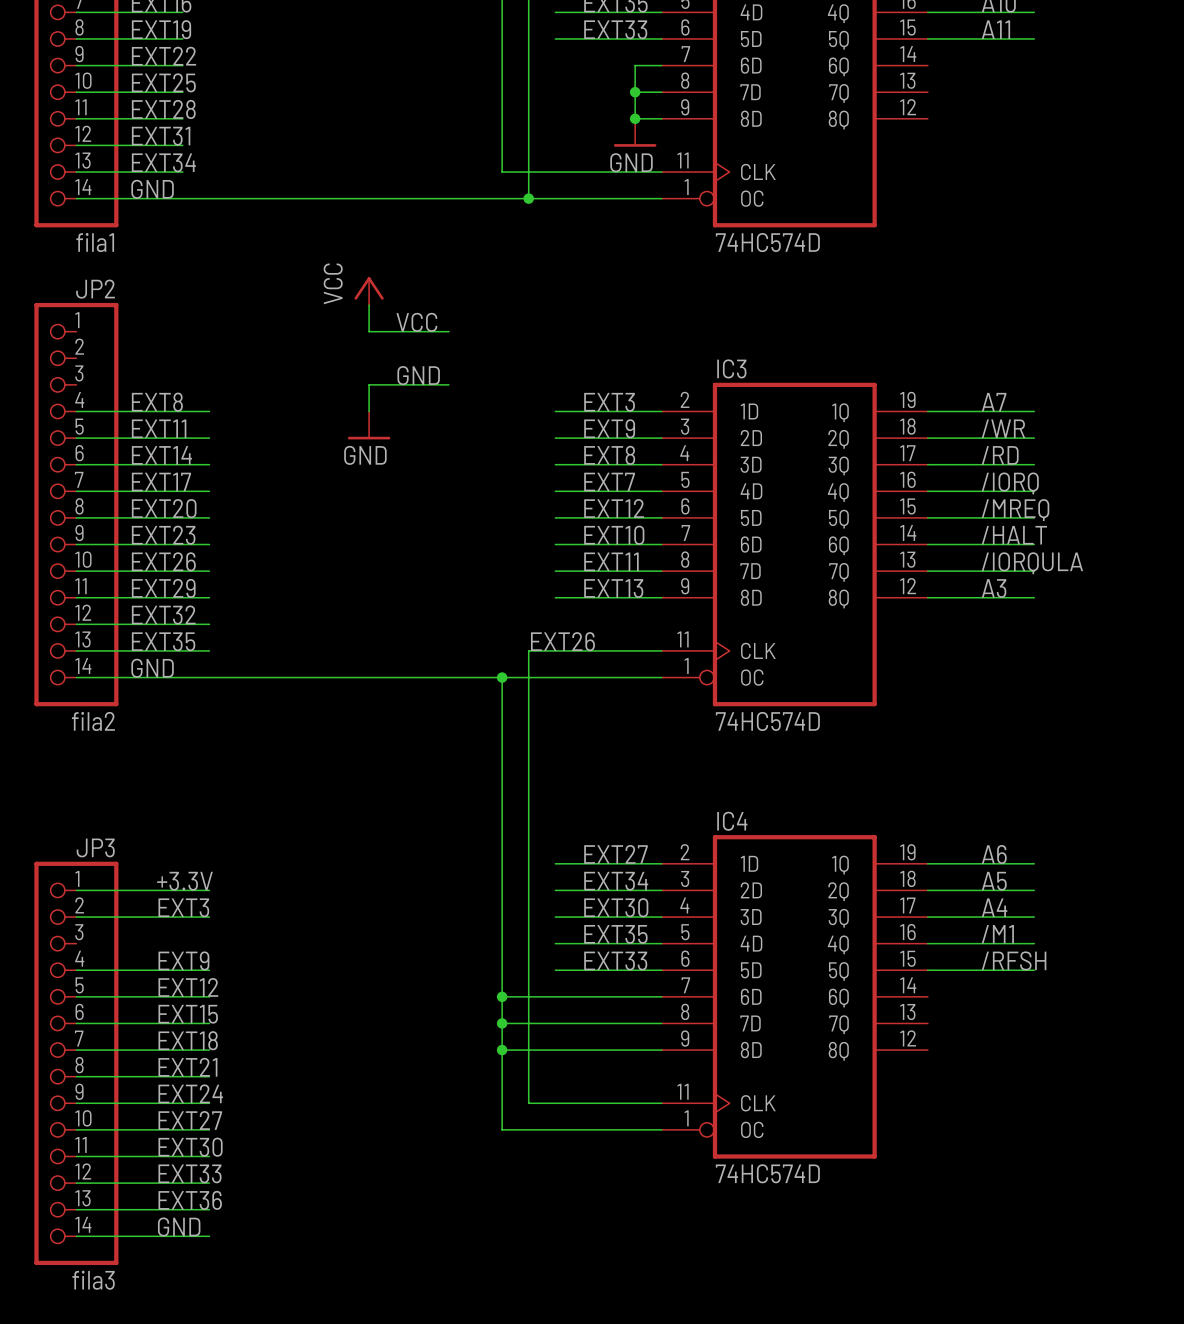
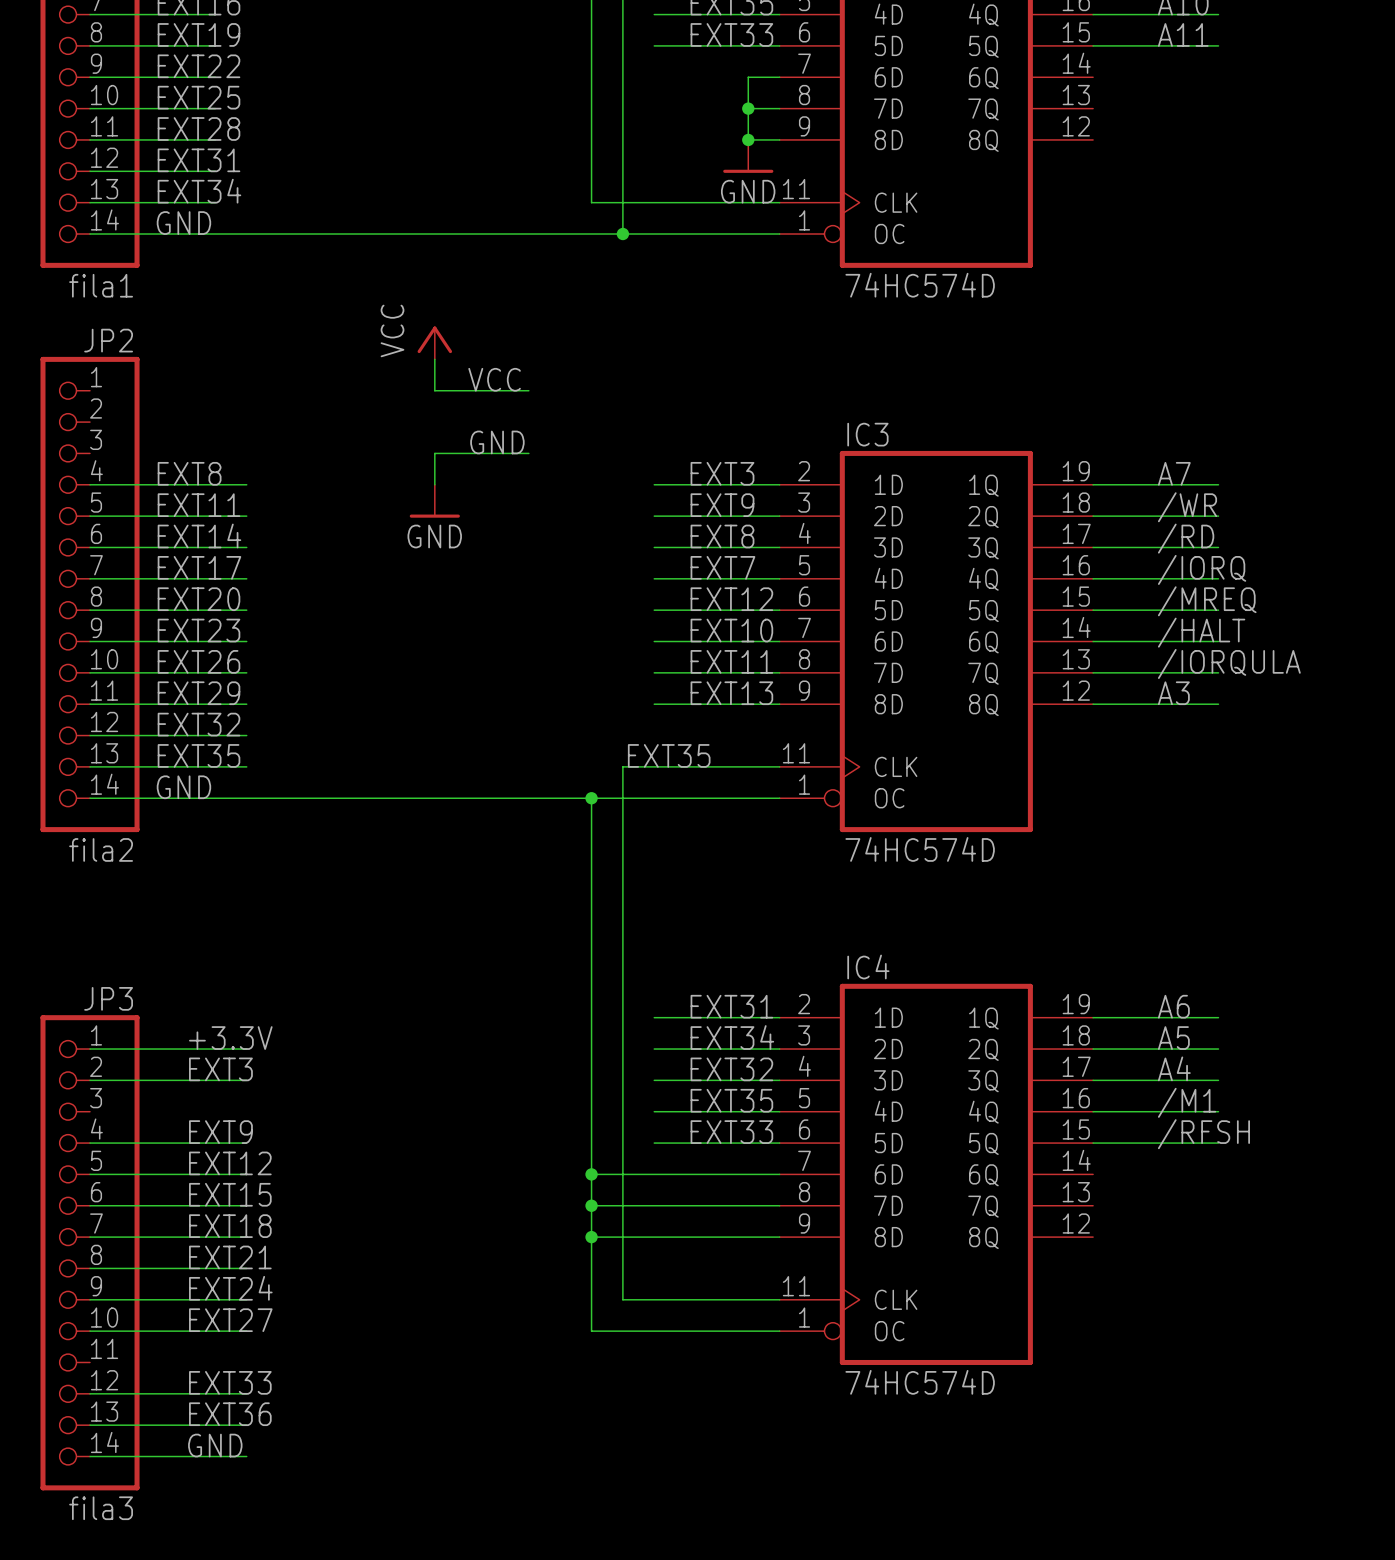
label: EXT26 (562, 641) -> EXT35 (669, 755)
label: EXT27 (615, 854) -> EXT31 (731, 1006)
label: EXT30 (616, 907) -> EXT32 (731, 1069)
label: EXT30 (190, 1147) -> none
wire: (76, 1156) (209, 1156) -> none

